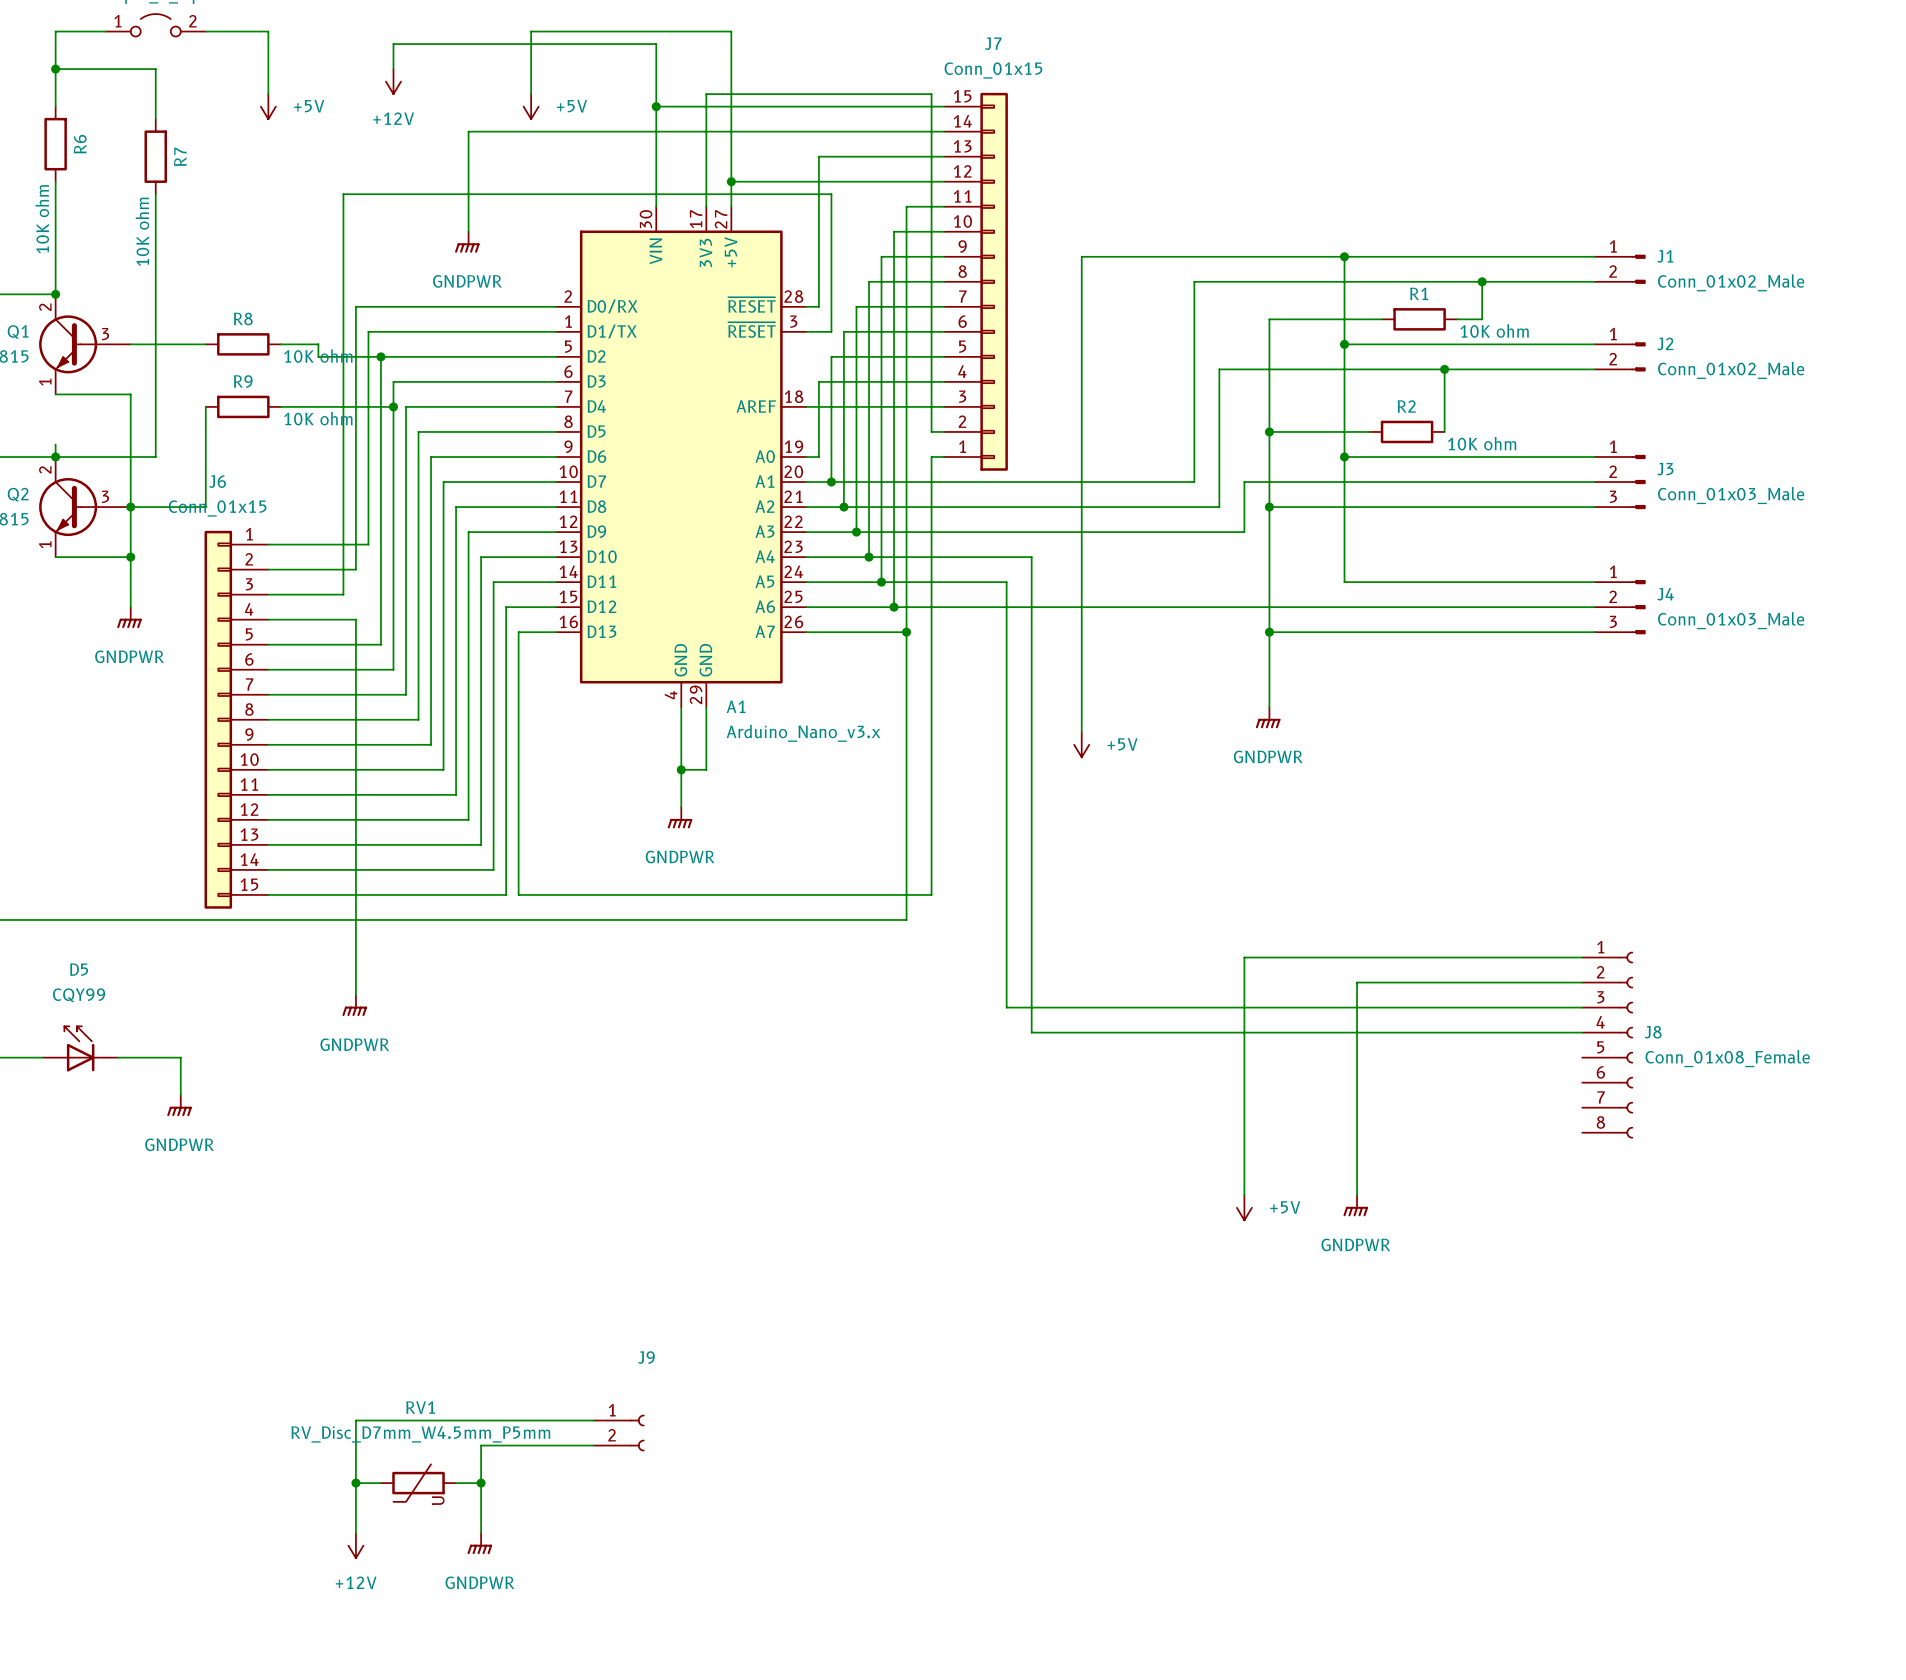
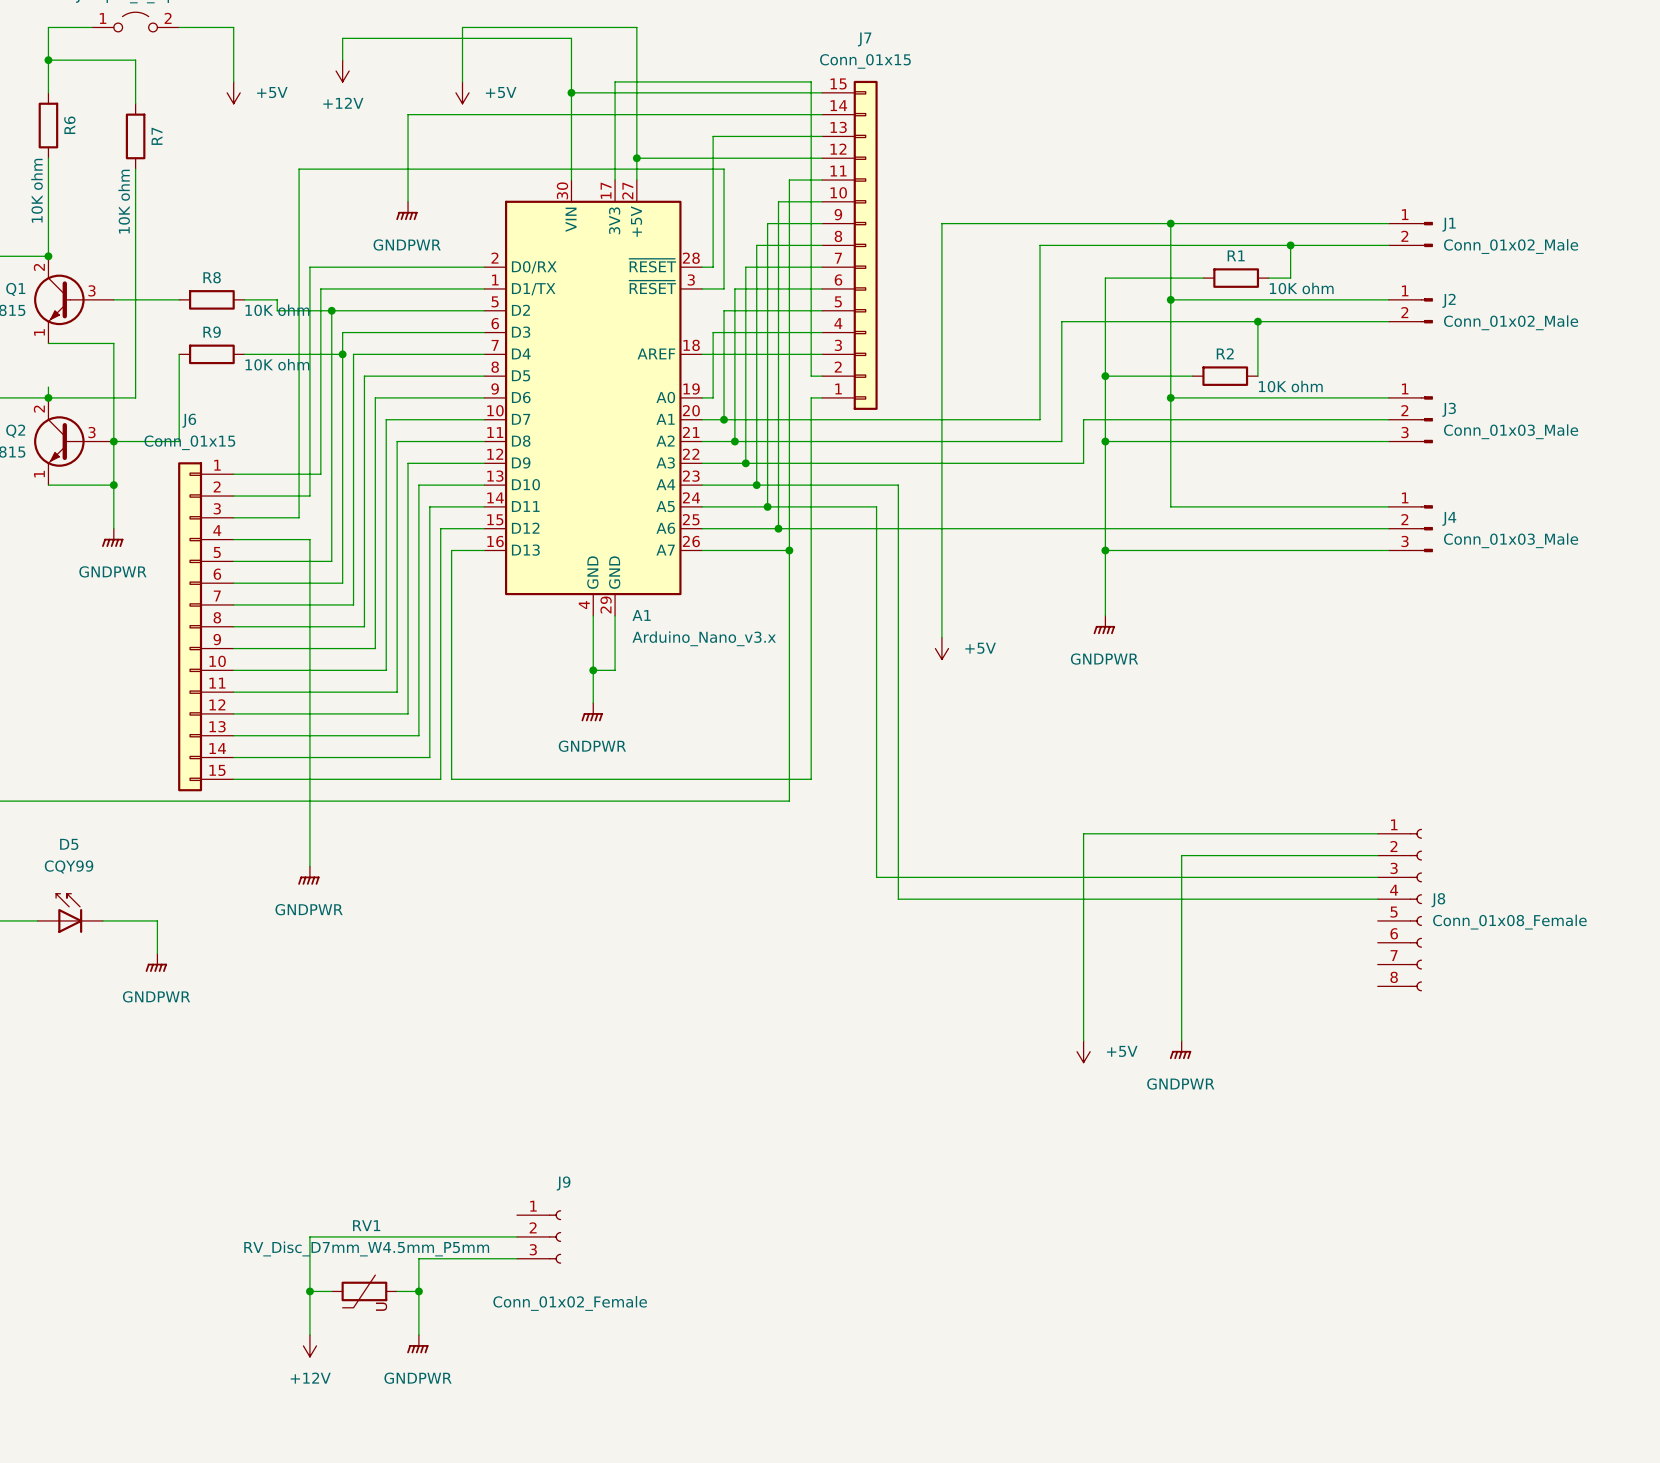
J9 symbol: [593, 1414, 645, 1452] -> [516, 1210, 562, 1264]
J9 value: none -> Conn_01x02_Female (570, 1303)

